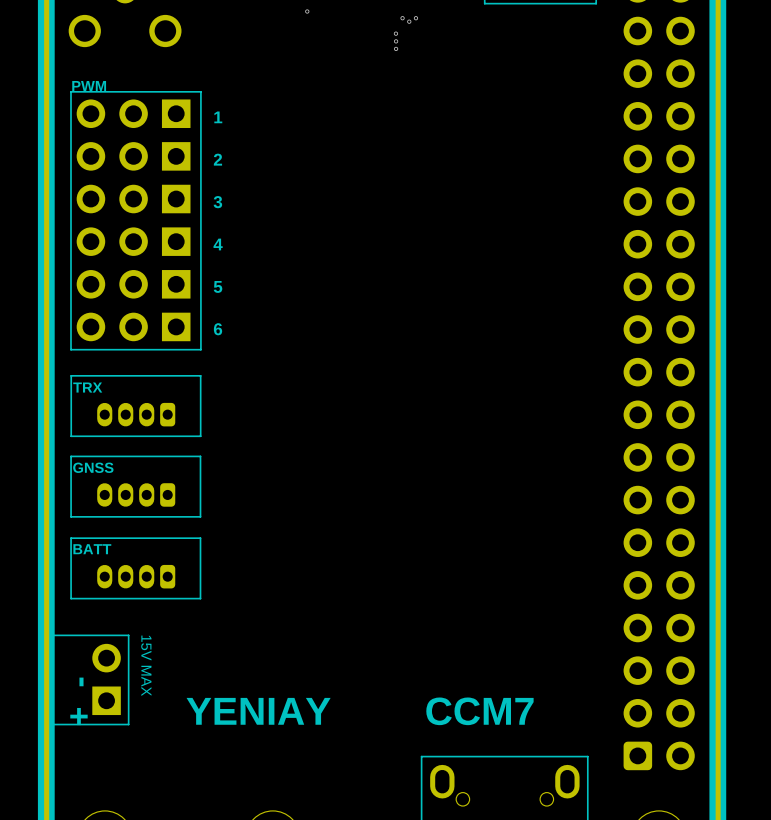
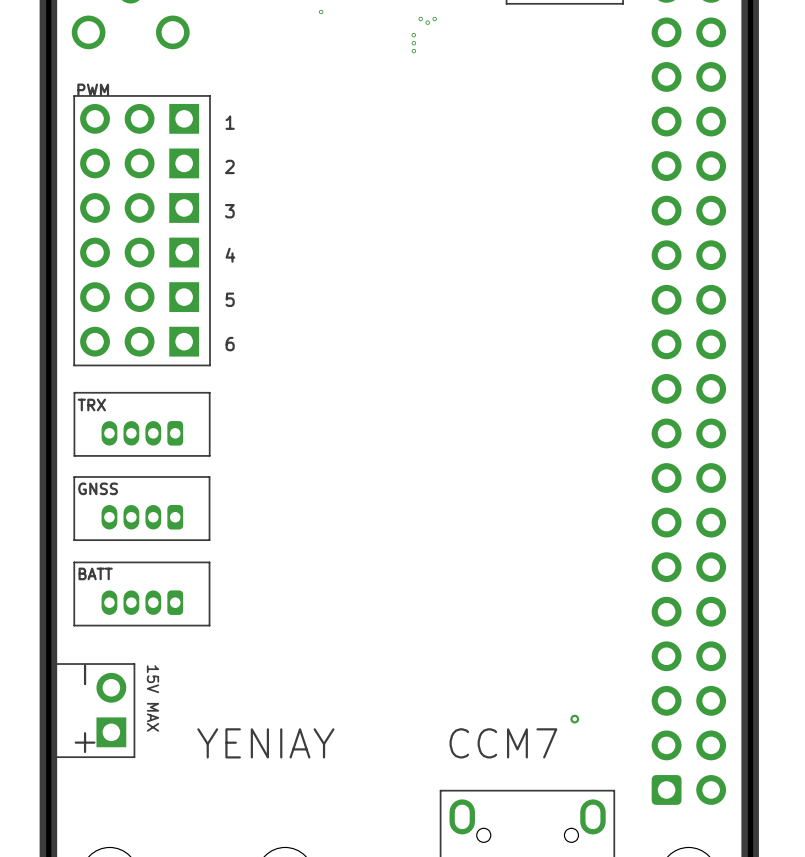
via: none -> (574, 719)

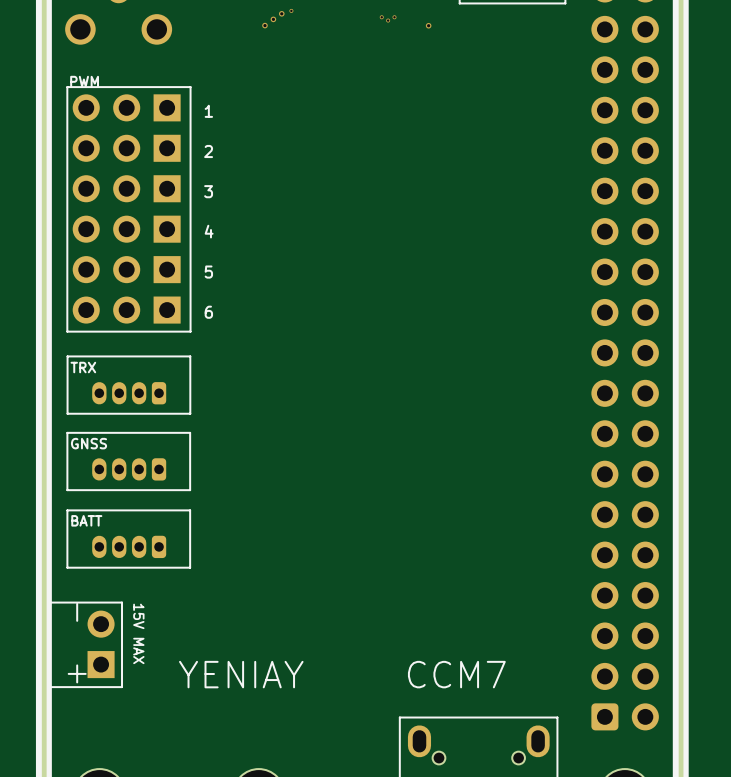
via: none -> (281, 13)
via: none -> (273, 19)
via: none -> (264, 25)
via: none -> (428, 25)
via: (413, 35) -> none
via: (413, 43) -> none
via: (413, 51) -> none
via: (574, 719) -> none

